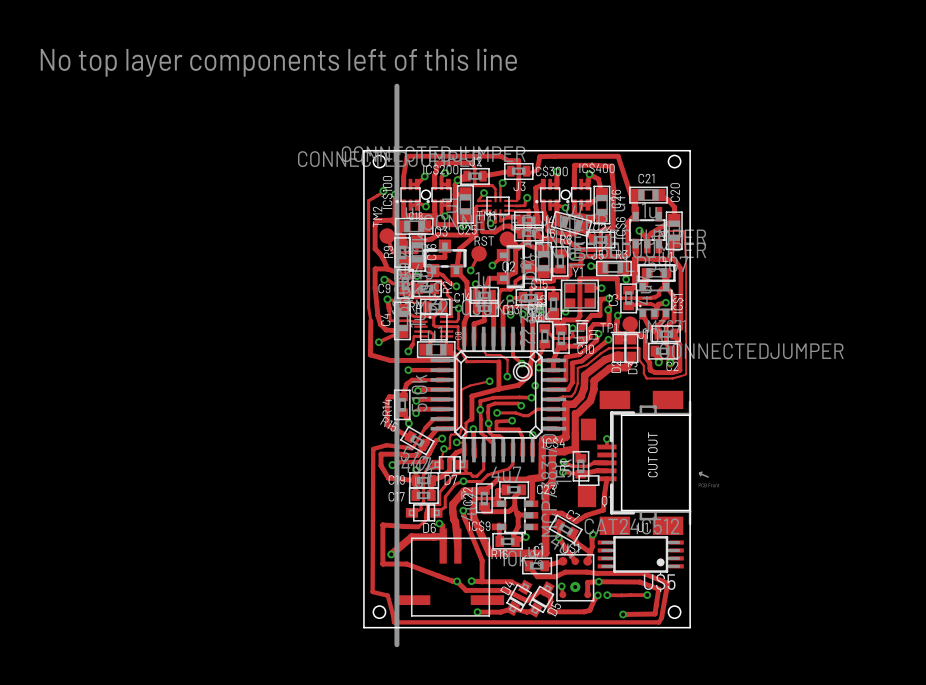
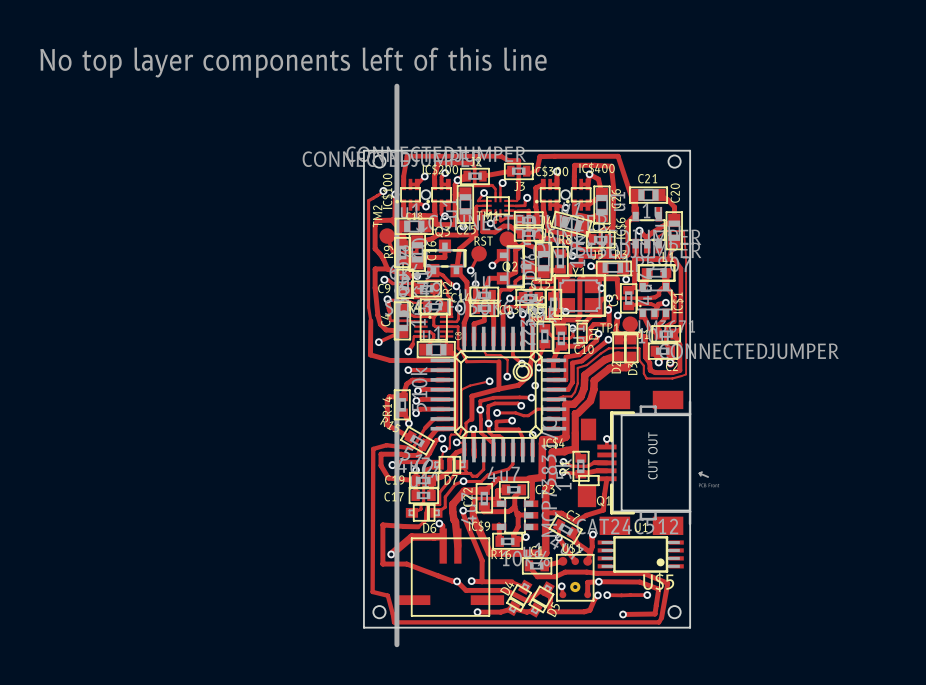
Y1 footprint: [560, 279, 600, 312] -> [553, 274, 607, 318]

